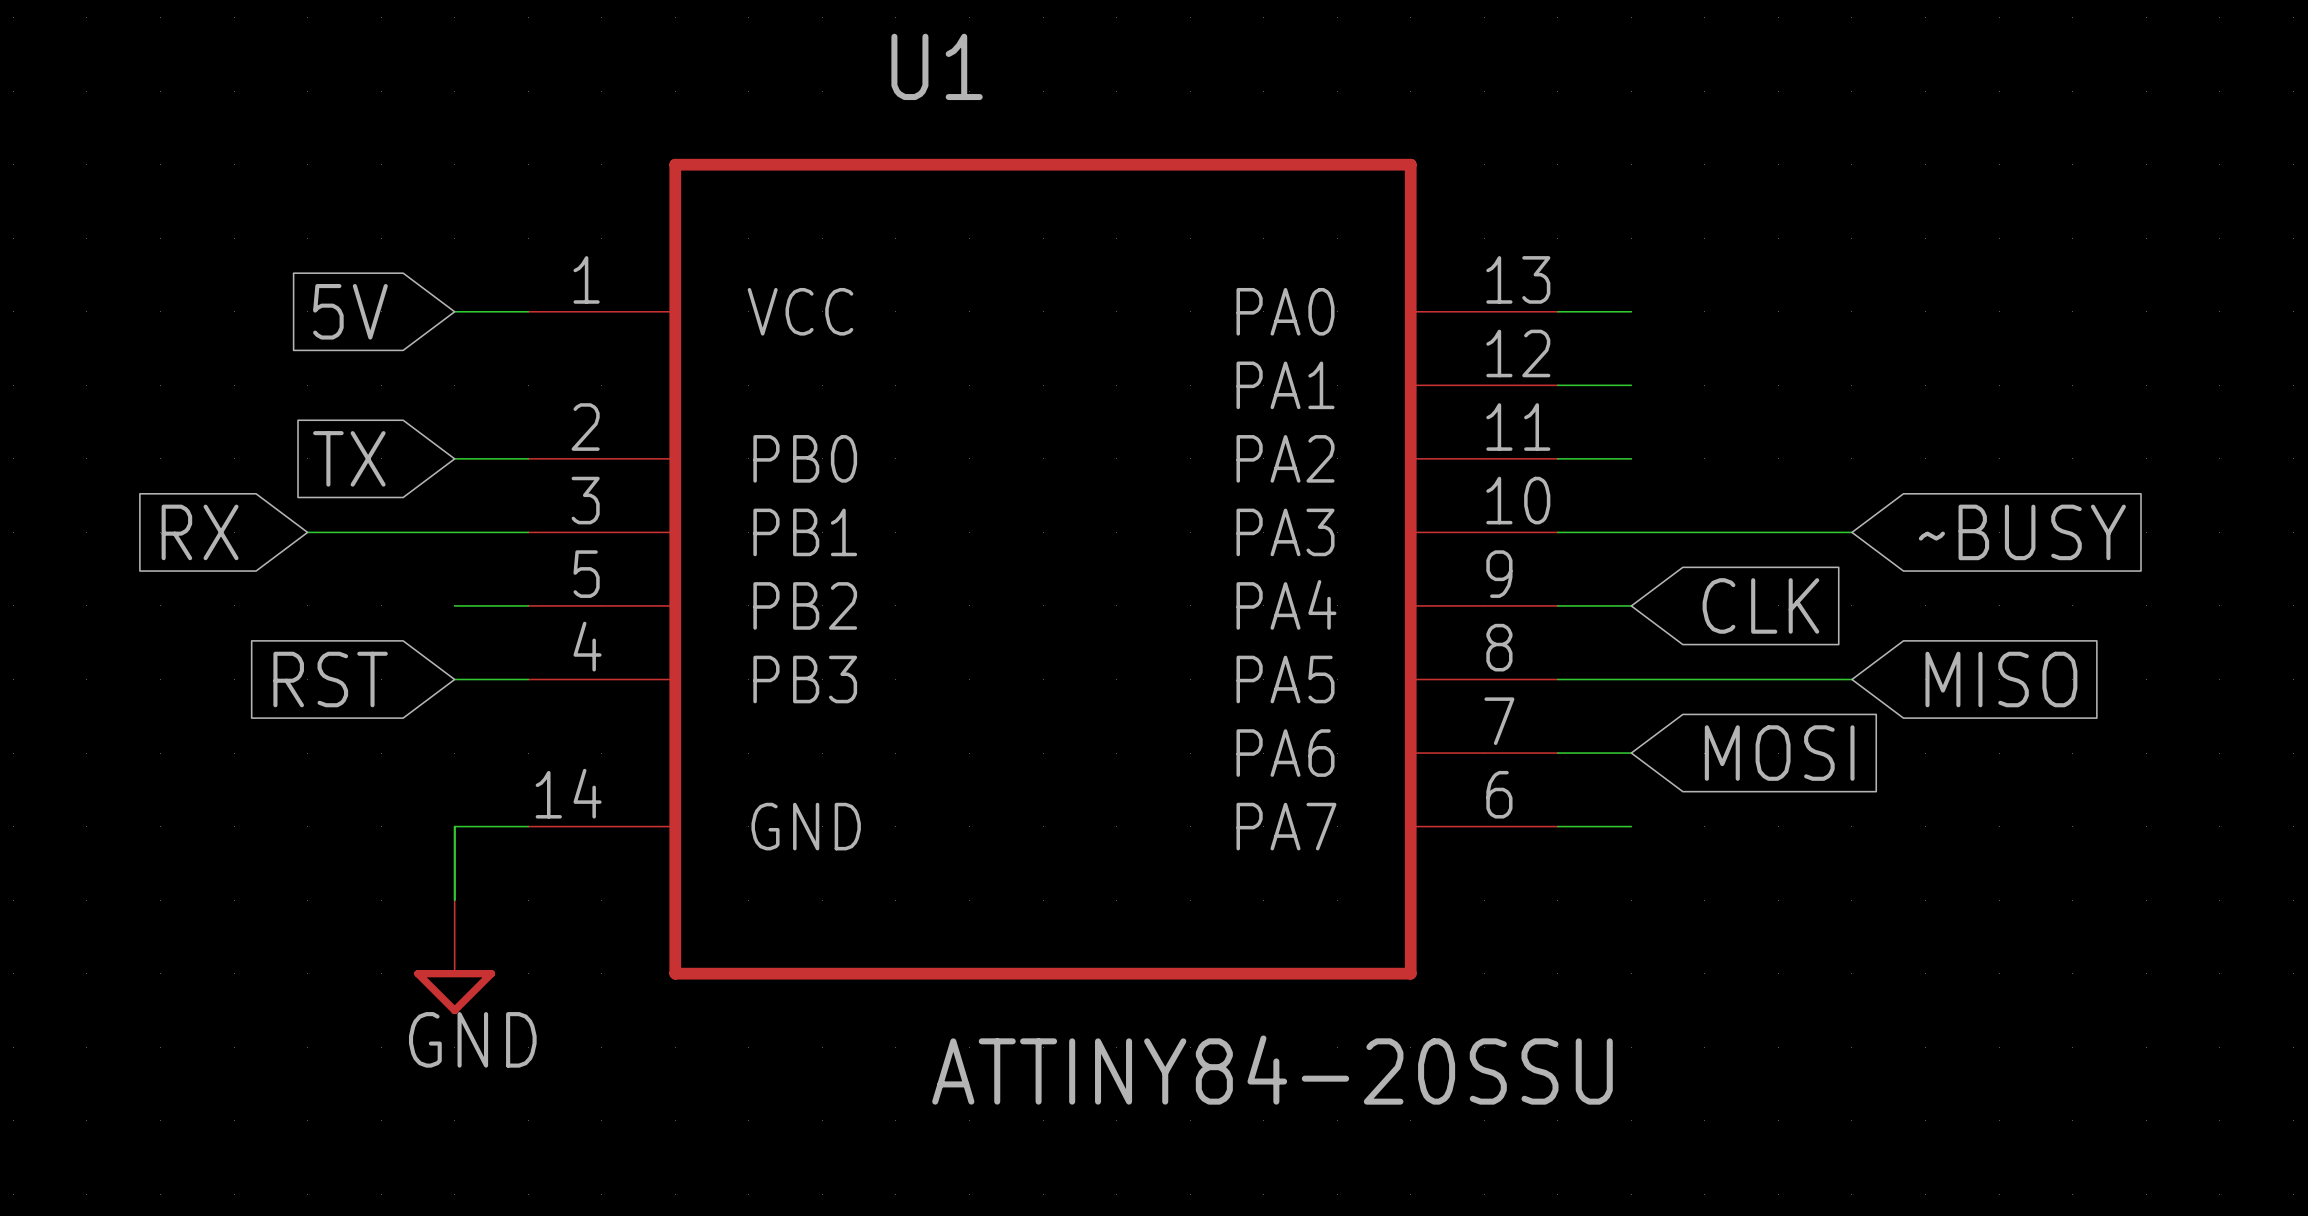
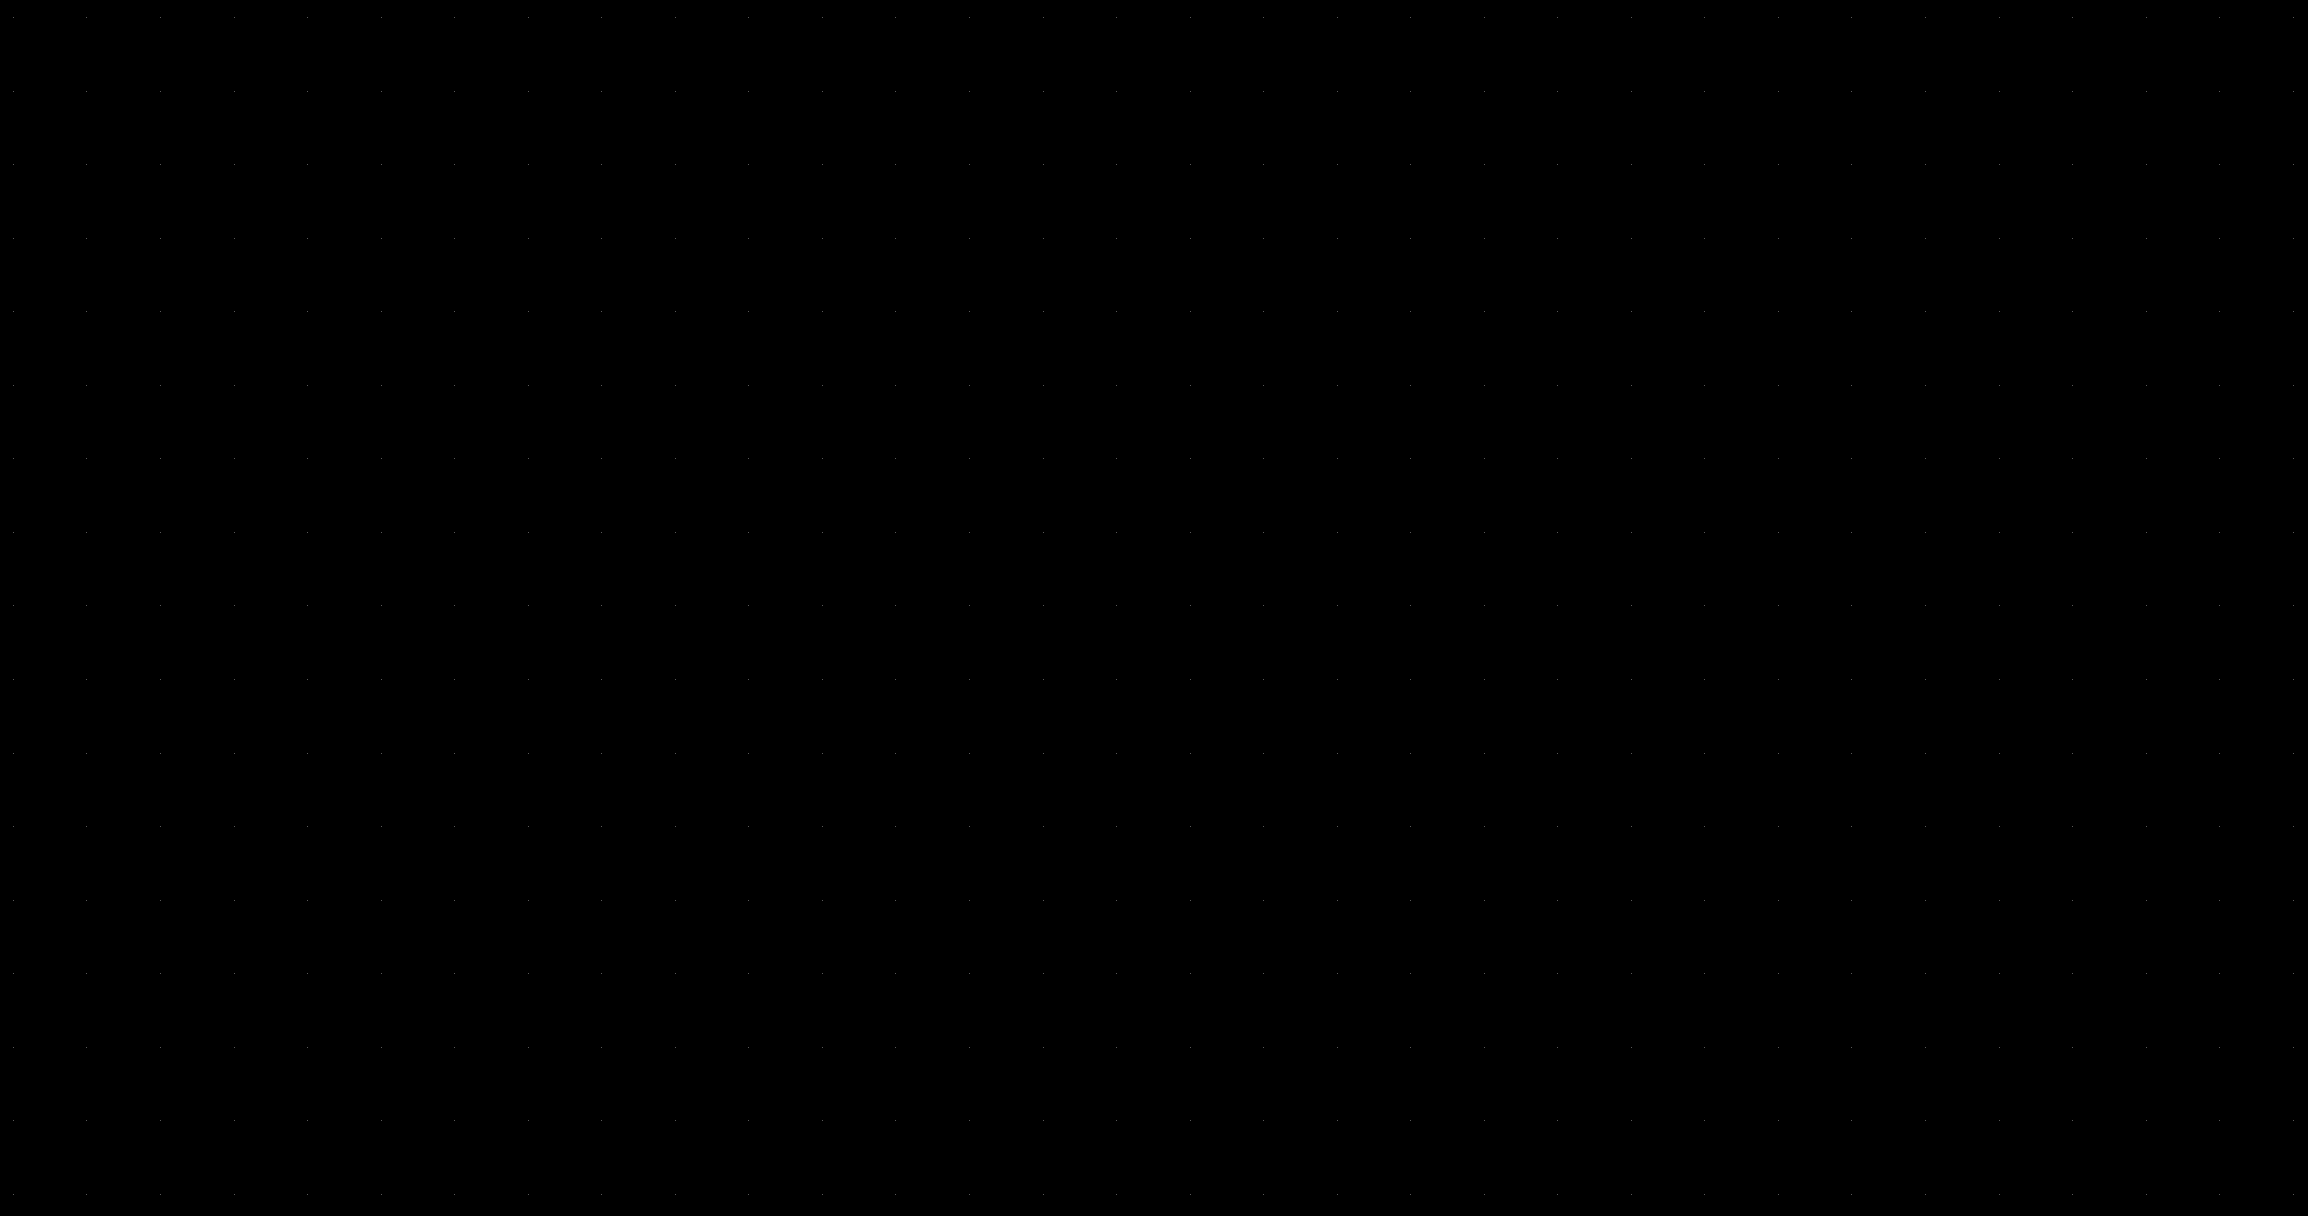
global label: 5V (350, 311) -> none
wire: (454, 311) (528, 311) -> none
wire: (1557, 311) (1631, 311) -> none
wire: (1557, 385) (1631, 385) -> none
global label: TX (349, 458) -> none
wire: (454, 458) (528, 458) -> none
wire: (1557, 458) (1631, 458) -> none
global label: RX (200, 532) -> none
wire: (307, 532) (528, 532) -> none
wire: (1557, 532) (1851, 532) -> none
global label: ~BUSY (2022, 532) -> none
U1: ATTINY84-20SSU (1043, 569) -> none
wire: (454, 605) (528, 605) -> none
wire: (1557, 605) (1631, 605) -> none
global label: CLK (1760, 605) -> none
global label: RST (330, 679) -> none
wire: (454, 679) (528, 679) -> none
wire: (1557, 679) (1851, 679) -> none
global label: MISO (2001, 679) -> none
wire: (1557, 753) (1631, 753) -> none
global label: MOSI (1779, 753) -> none
wire: (528, 826) (454, 826) (454, 900) -> none
wire: (1557, 826) (1631, 826) -> none
power symbol: GND (454, 957) -> none

